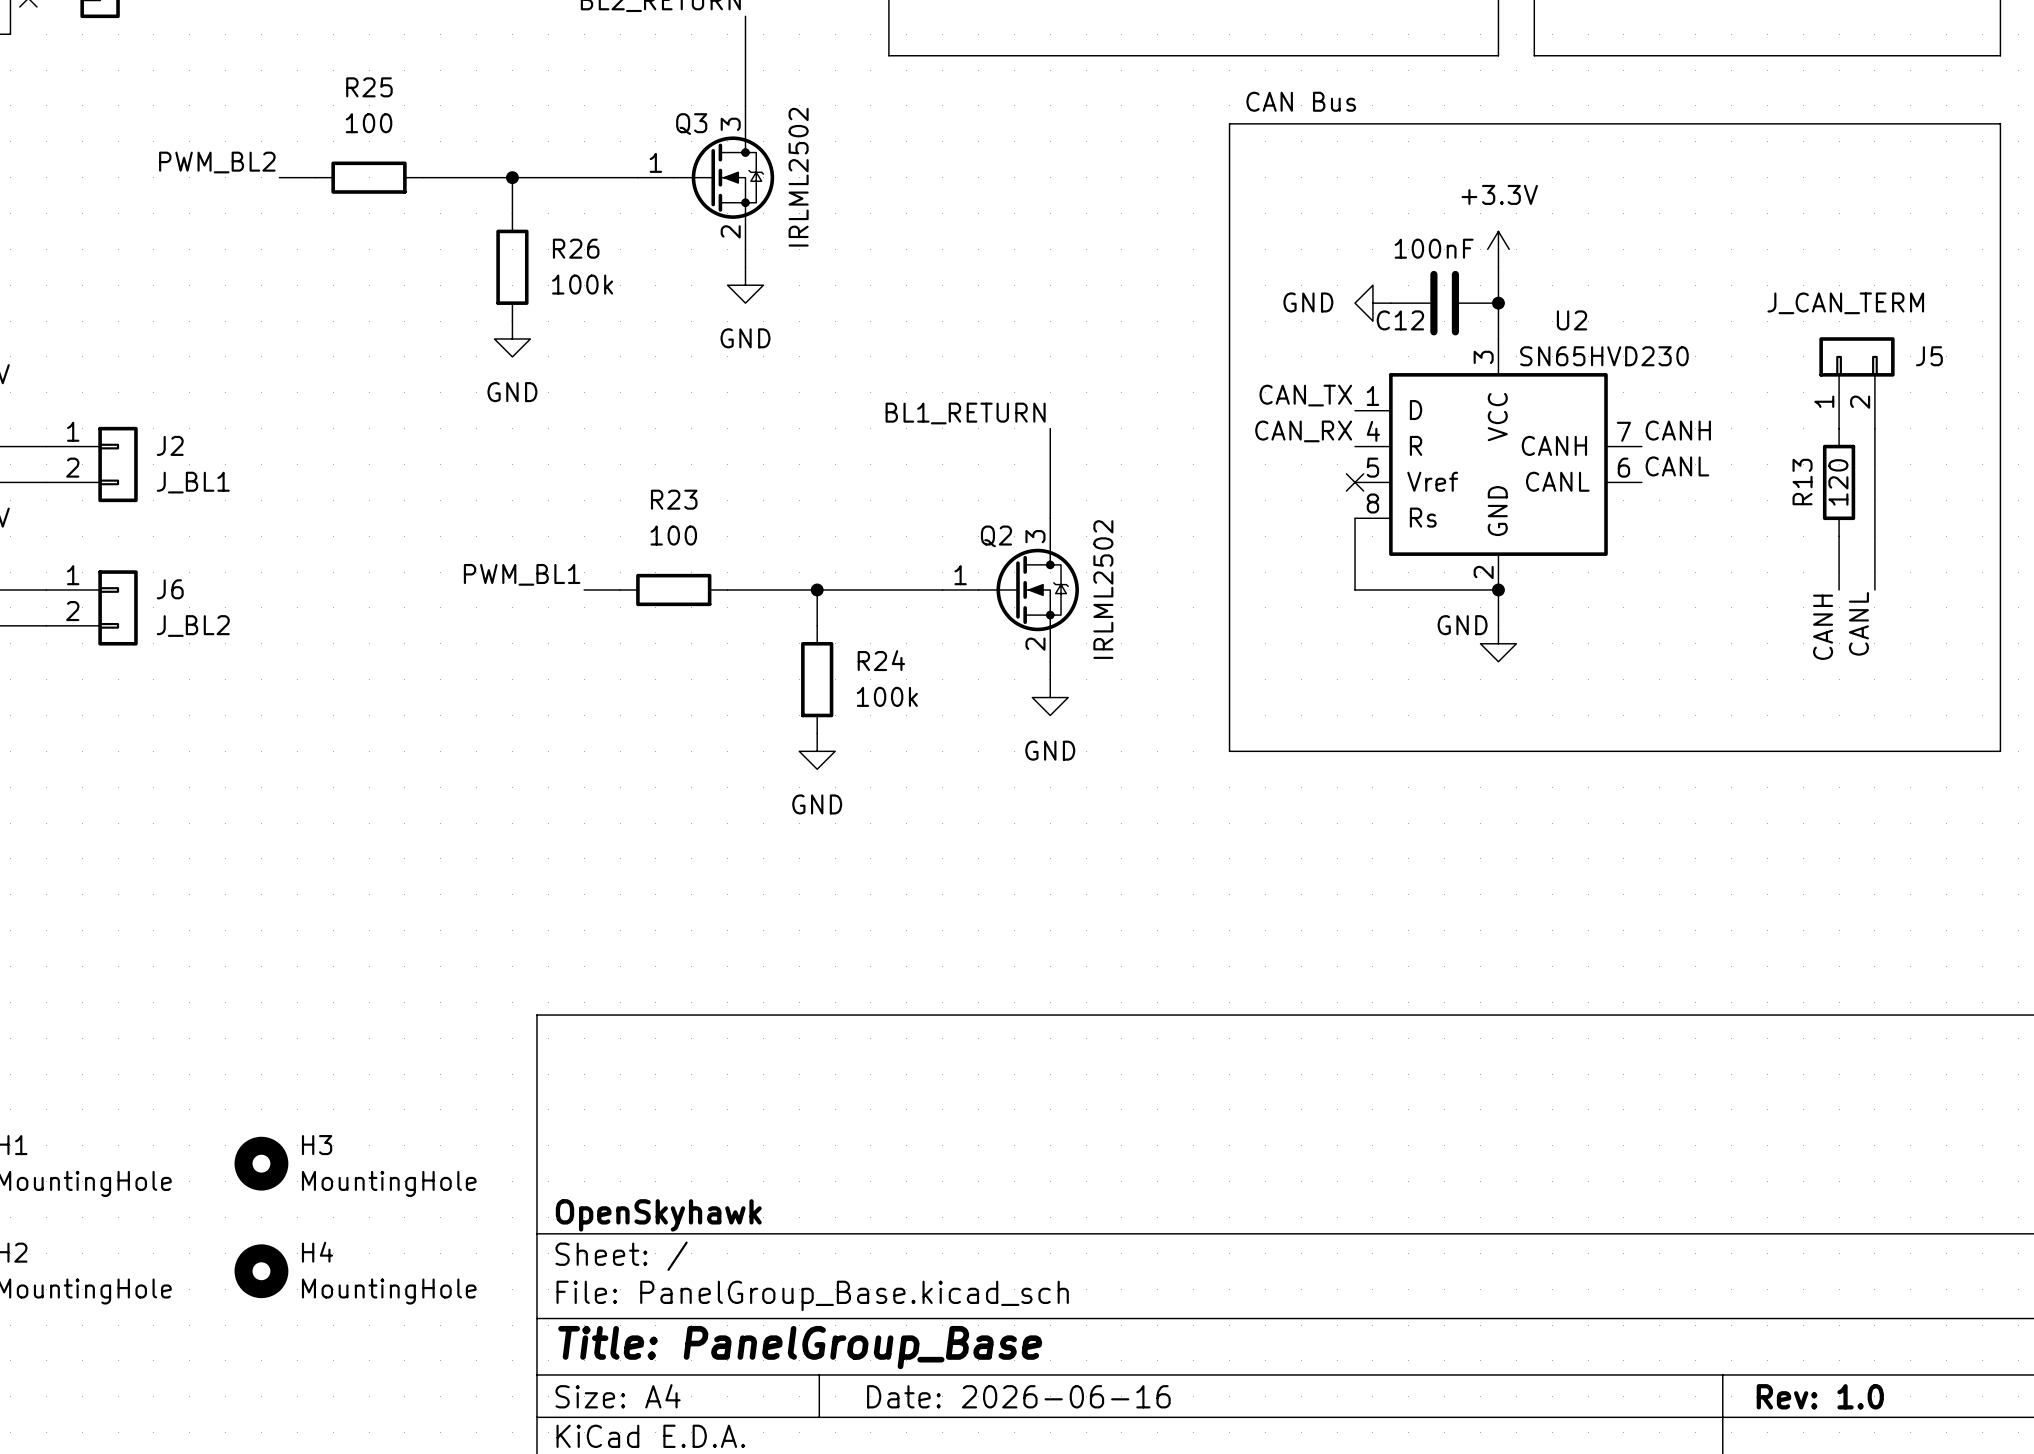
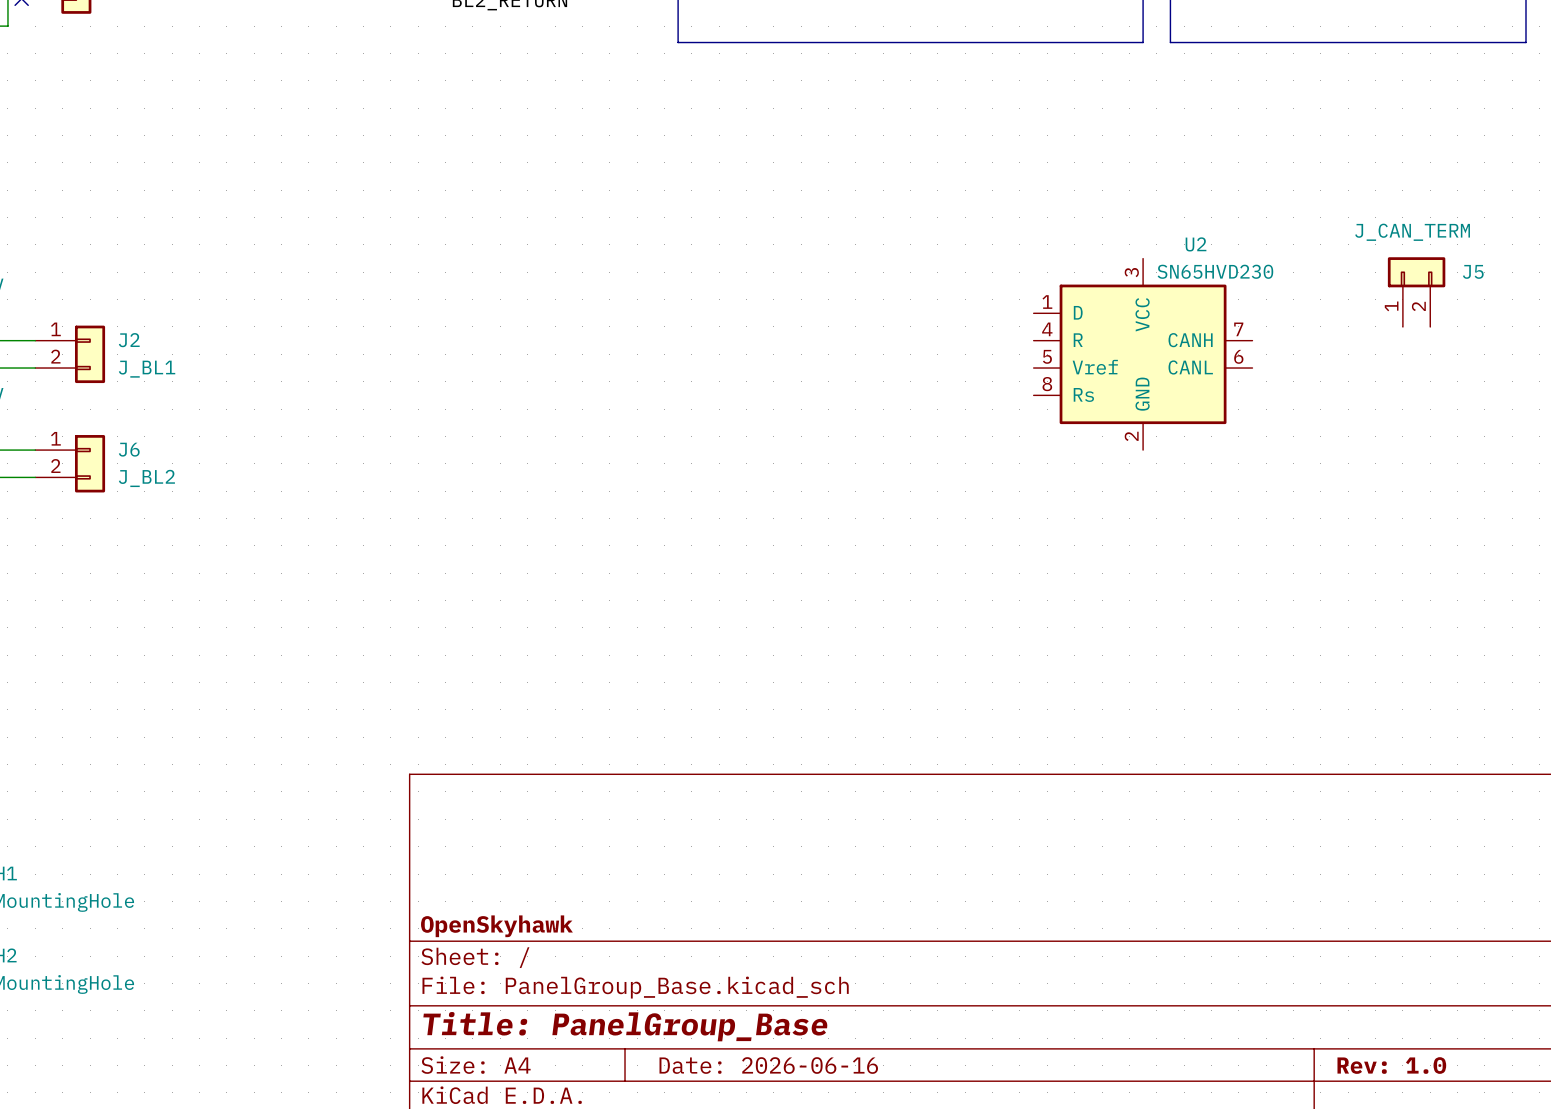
wire: (745, 16) (745, 105) -> none
text: CAN Bus (1301, 101) -> none
line: (1229, 123) (2000, 123) (2000, 751) (1229, 751) (1229, 123) -> none
label: PWM_BL2 (217, 162) -> none
wire: (279, 177) (315, 177) -> none
R25: 100 (369, 177) -> none
wire: (422, 177) (637, 177) -> none
wire: (512, 177) (512, 213) -> none
junction: (512, 177) -> none
Q3: IRLML2502 (706, 177) -> none
wire: (745, 249) (745, 267) -> none
power symbol: +3.3V (1498, 249) -> none
R26: 100k (512, 267) -> none
wire: (1498, 267) (1498, 339) -> none
power symbol: GND (745, 285) -> none
power symbol: GND (1372, 303) -> none
C12: 100nF (1444, 303) -> none
junction: (1498, 303) -> none
power symbol: GND (512, 339) -> none
label: CAN_TX (1305, 395) -> none
label: BL1_RETURN (965, 413) -> none
wire: (1050, 428) (1050, 518) -> none
wire: (1874, 428) (1874, 589) -> none
label: CANH (1678, 430) -> none
label: CAN_RX (1303, 431) -> none
label: CANL (1677, 466) -> none
no-connect mark: (1355, 482) -> none
R13: 120 (1839, 482) -> none
wire: (1355, 518) (1355, 589) (1498, 589) (1498, 625) -> none
wire: (1839, 536) (1839, 589) -> none
label: PWM_BL1 (522, 574) -> none
wire: (584, 589) (620, 589) -> none
R23: 100 (673, 589) -> none
wire: (727, 589) (942, 589) -> none
wire: (817, 589) (817, 625) -> none
junction: (817, 589) -> none
Q2: IRLML2502 (1010, 589) -> none
junction: (1498, 589) -> none
label: CANL (1858, 623) -> none
label: CANH (1823, 627) -> none
power symbol: GND (1498, 643) -> none
wire: (1050, 661) (1050, 679) -> none
R24: 100k (817, 679) -> none
power symbol: GND (1050, 697) -> none
power symbol: GND (817, 751) -> none
H3: MountingHole (261, 1163) -> none
H4: MountingHole (261, 1271) -> none

